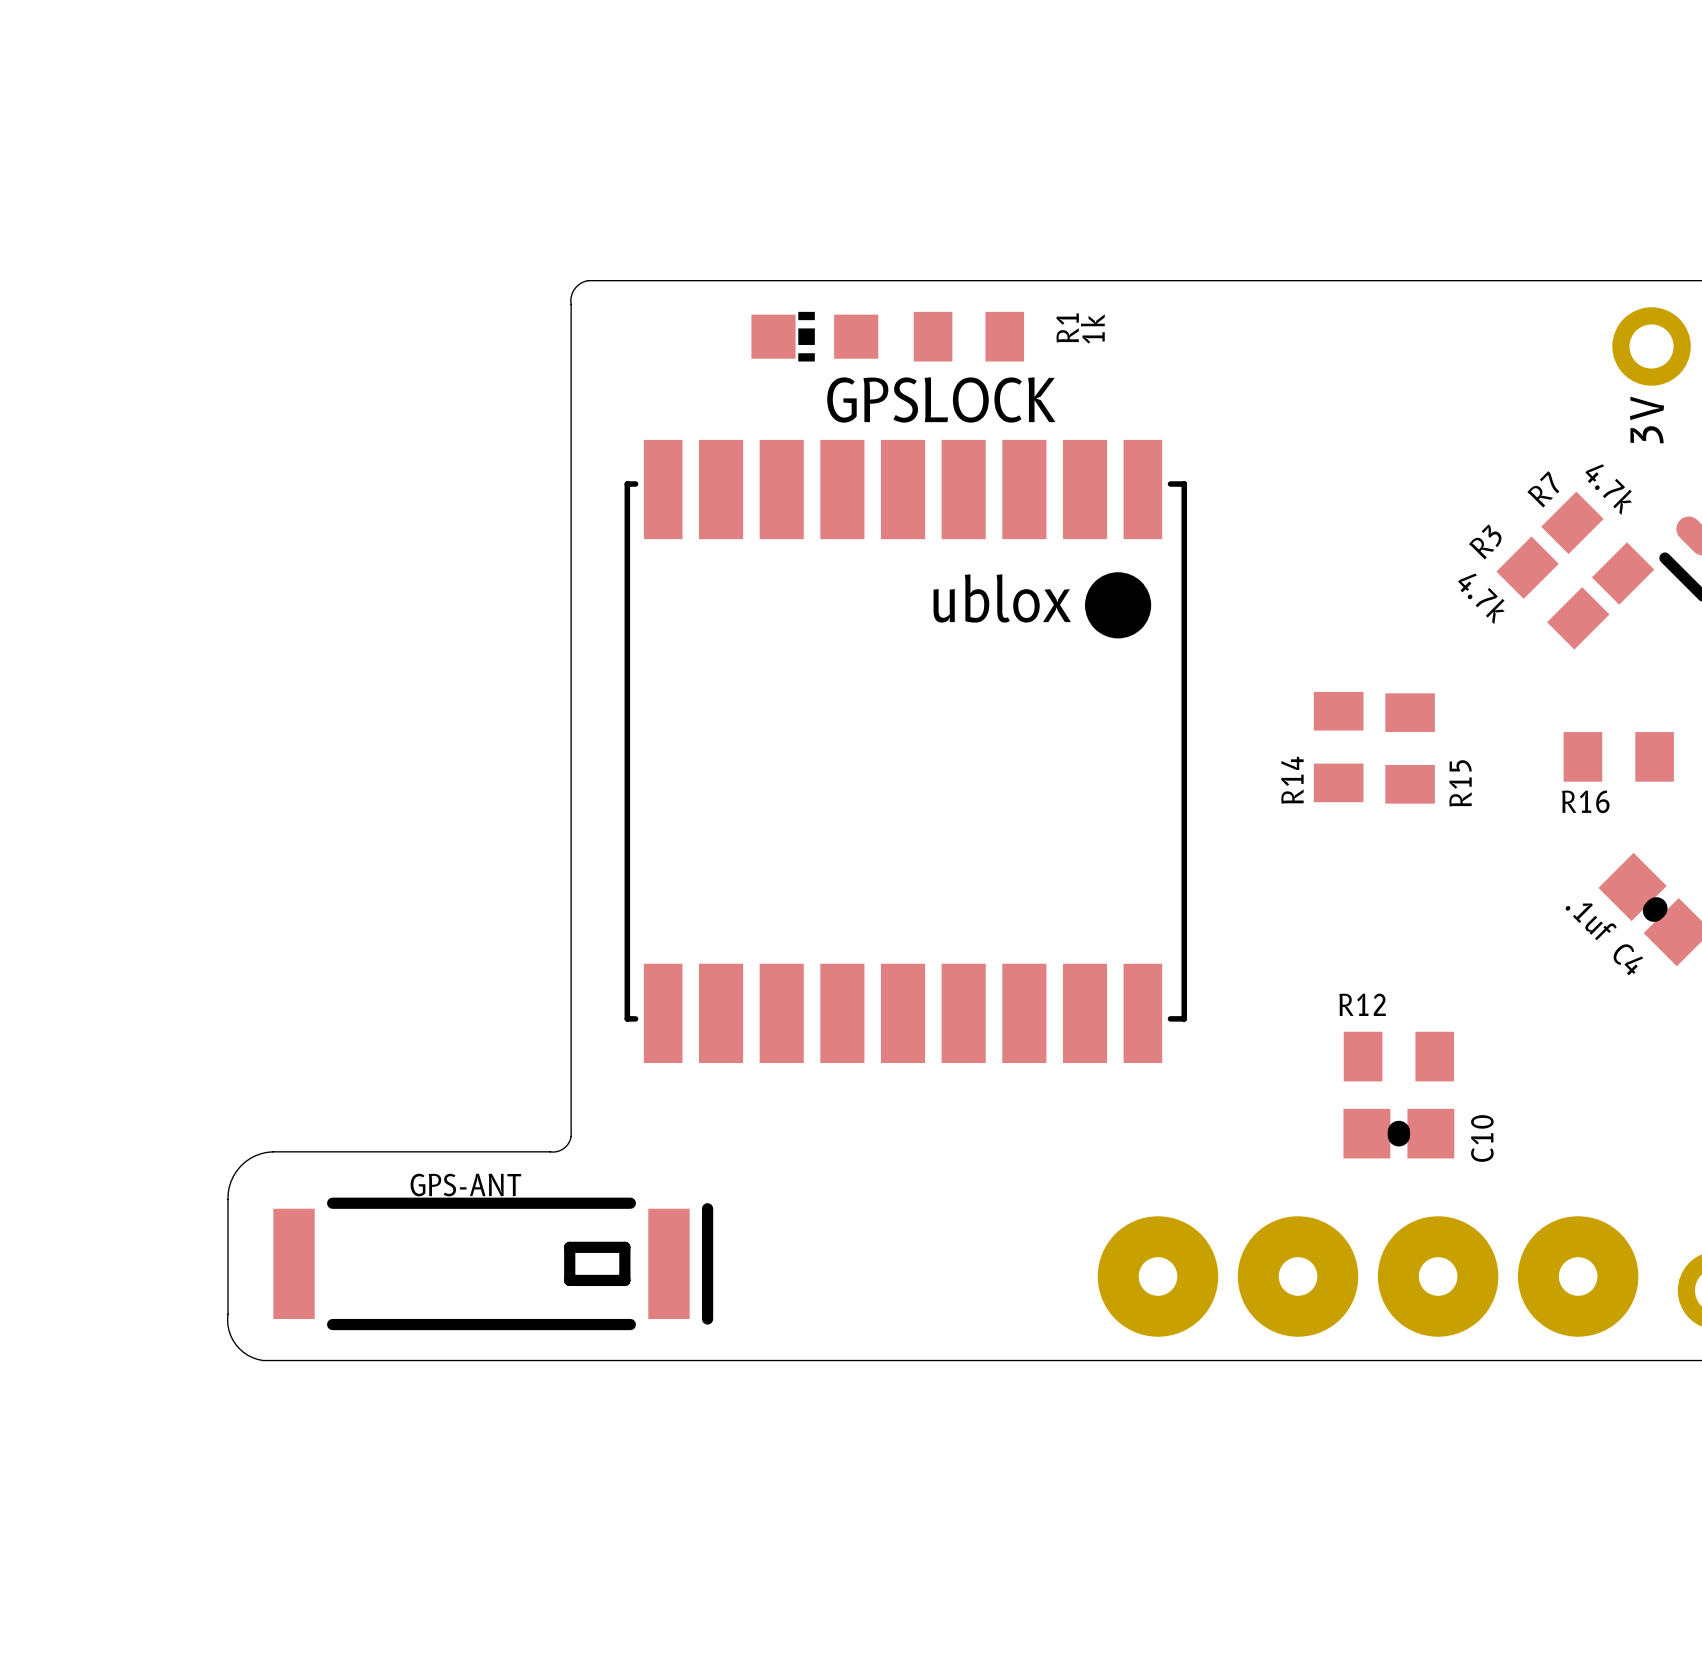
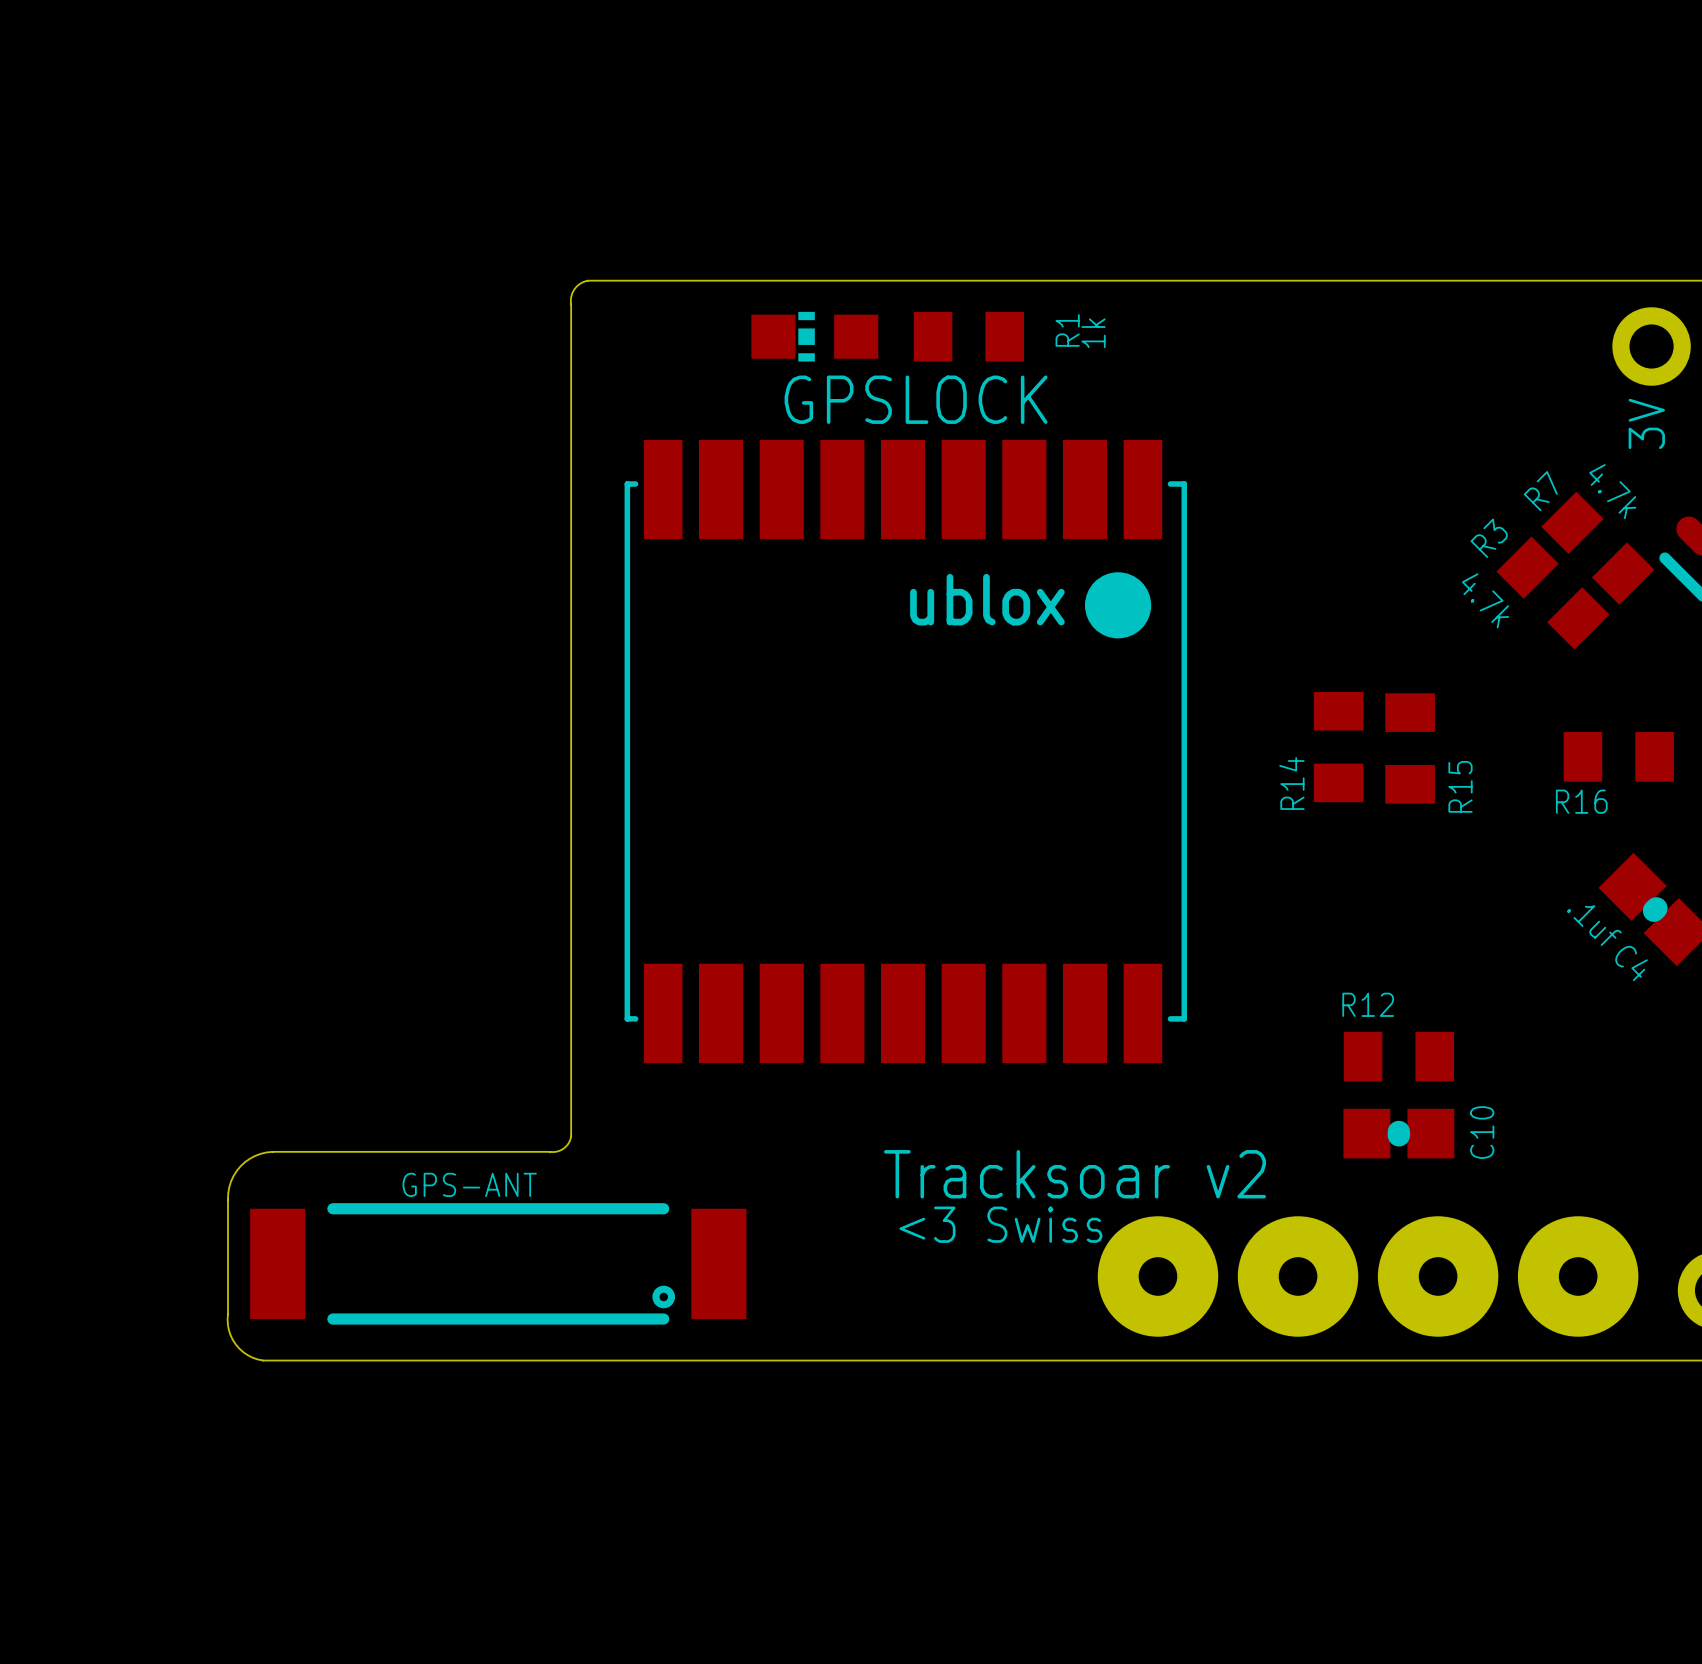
text: none -> Tracksoar v2 (1074, 1174)
GPS-ANT footprint: [273, 1197, 714, 1331] -> [250, 1203, 747, 1325]
text: none -> <3 Swiss (1000, 1224)

